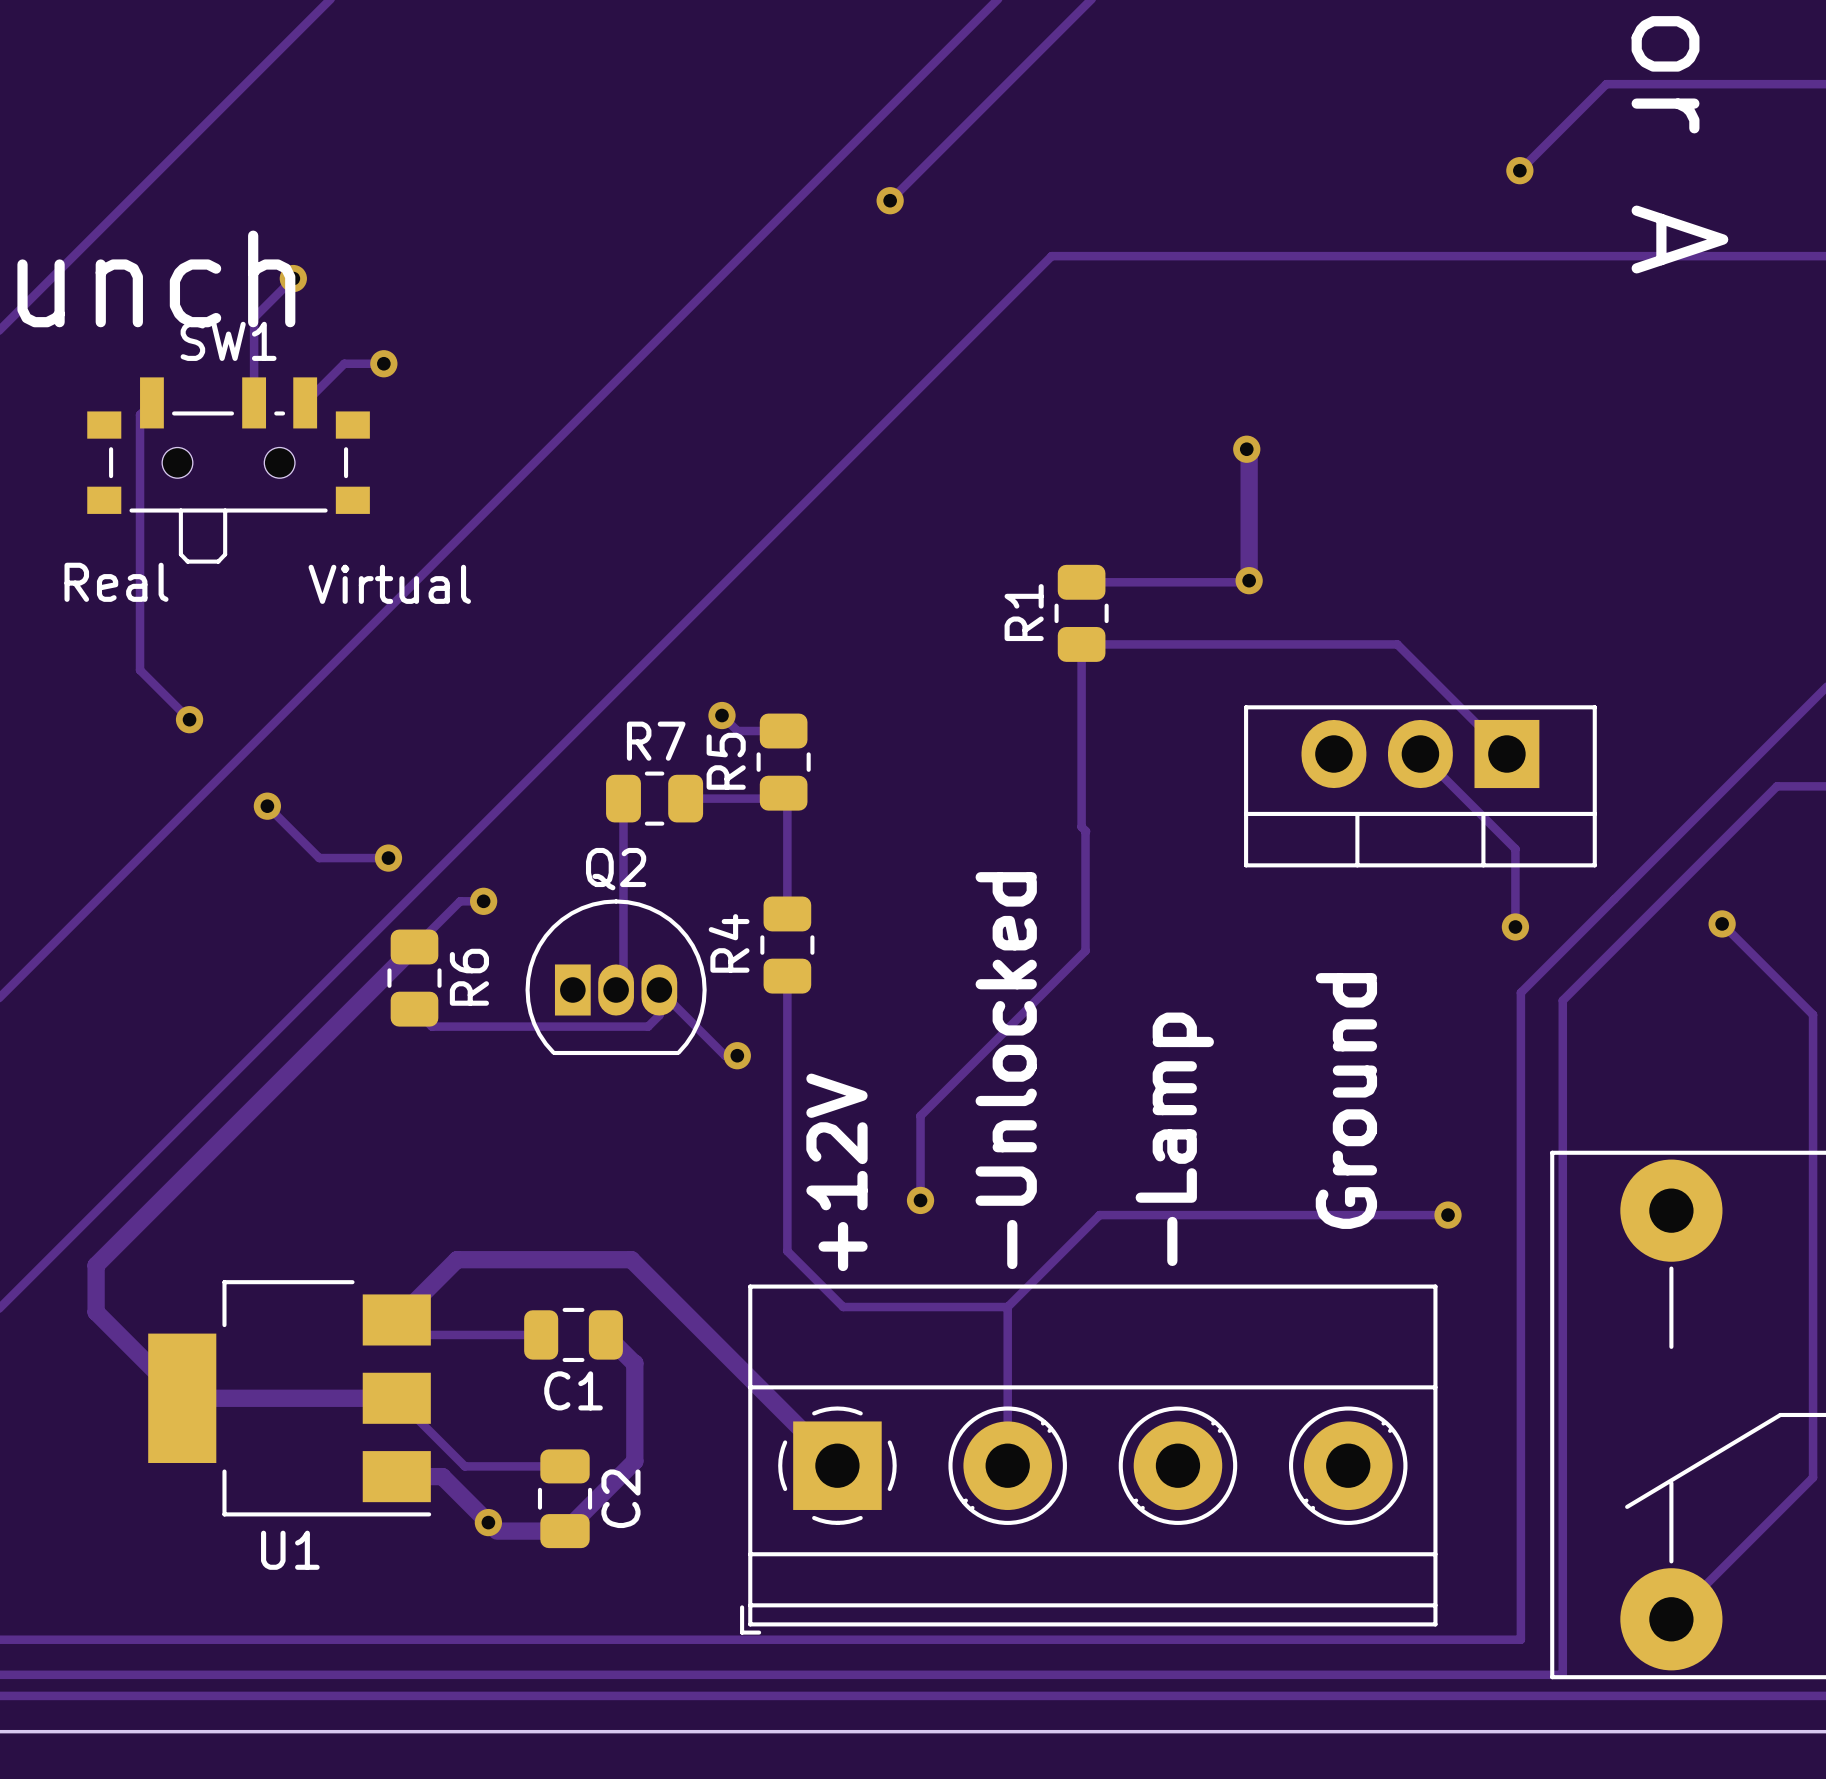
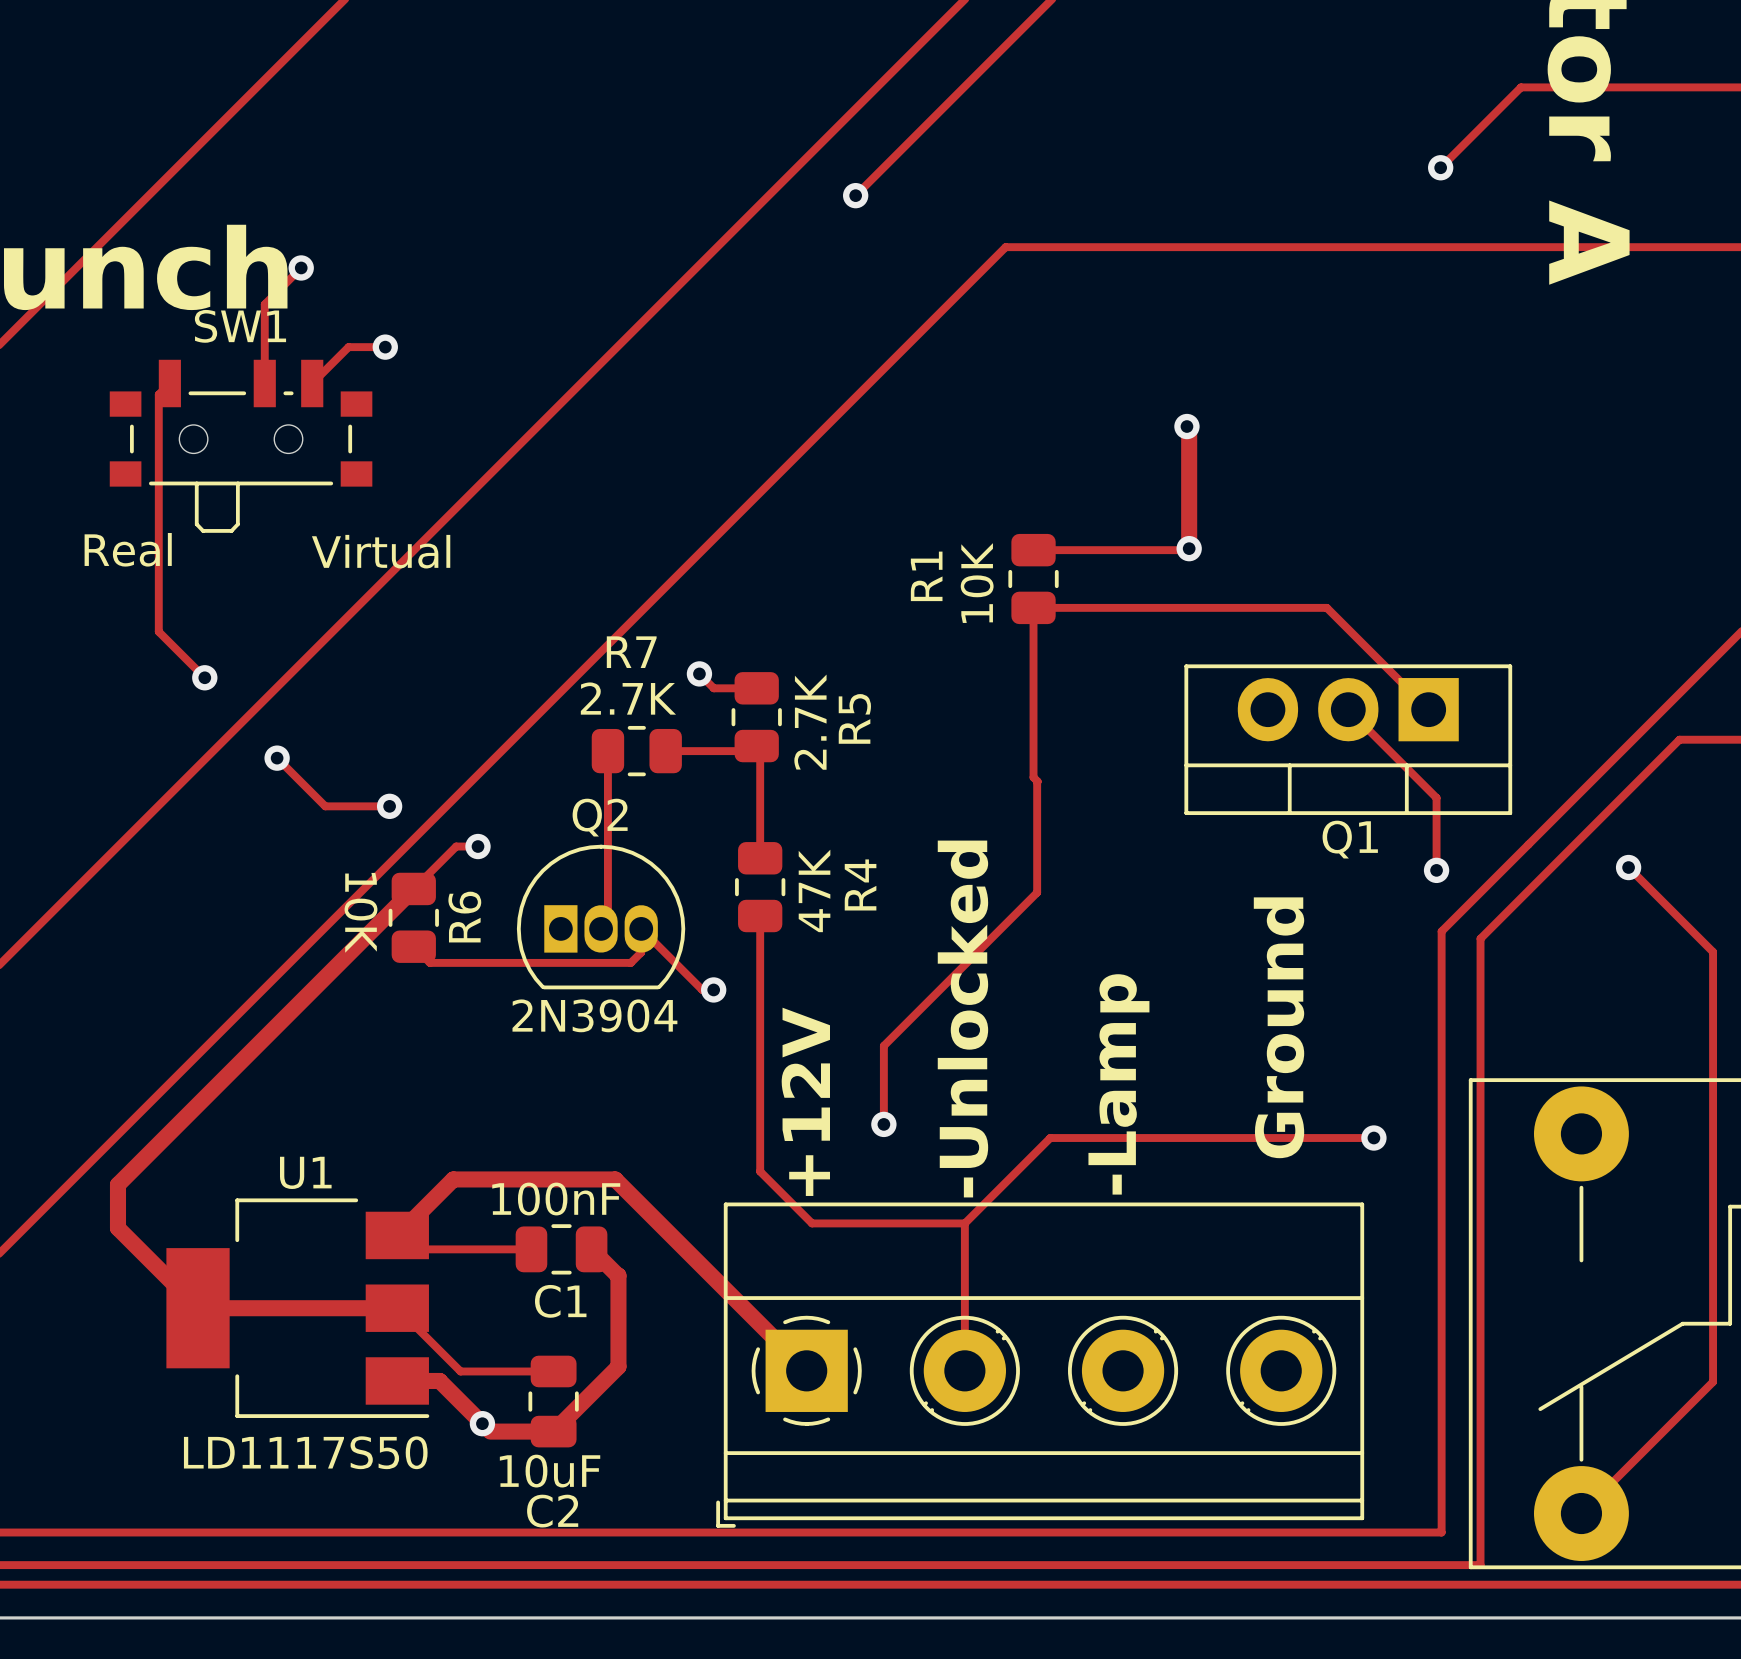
text: none -> 10K (977, 583)
R1 name position: R1 (1024, 612) -> R1 (926, 576)
R7 name position: R7 (656, 741) -> R7 (631, 652)
text: none -> 2.7K (628, 698)
R5 name position: R5 (726, 761) -> R5 (854, 718)
text: none -> 2.7K (810, 722)
text: none -> Q1 (1350, 839)
text: none -> 47K (814, 890)
R4 name position: R4 (729, 943) -> R4 (860, 884)
text: none -> 10K (361, 912)
text: none -> 2N3904 (594, 1015)
text: none -> 100nF (556, 1199)
C2 name rotation: 0° (620, 1498) -> 90° clockwise (552, 1511)
C2 name position: C2 (620, 1498) -> C2 (552, 1511)
U1 name position: U1 (290, 1550) -> U1 (305, 1172)
text: none -> LD1117S50 (305, 1452)
text: none -> 10uF (550, 1471)

